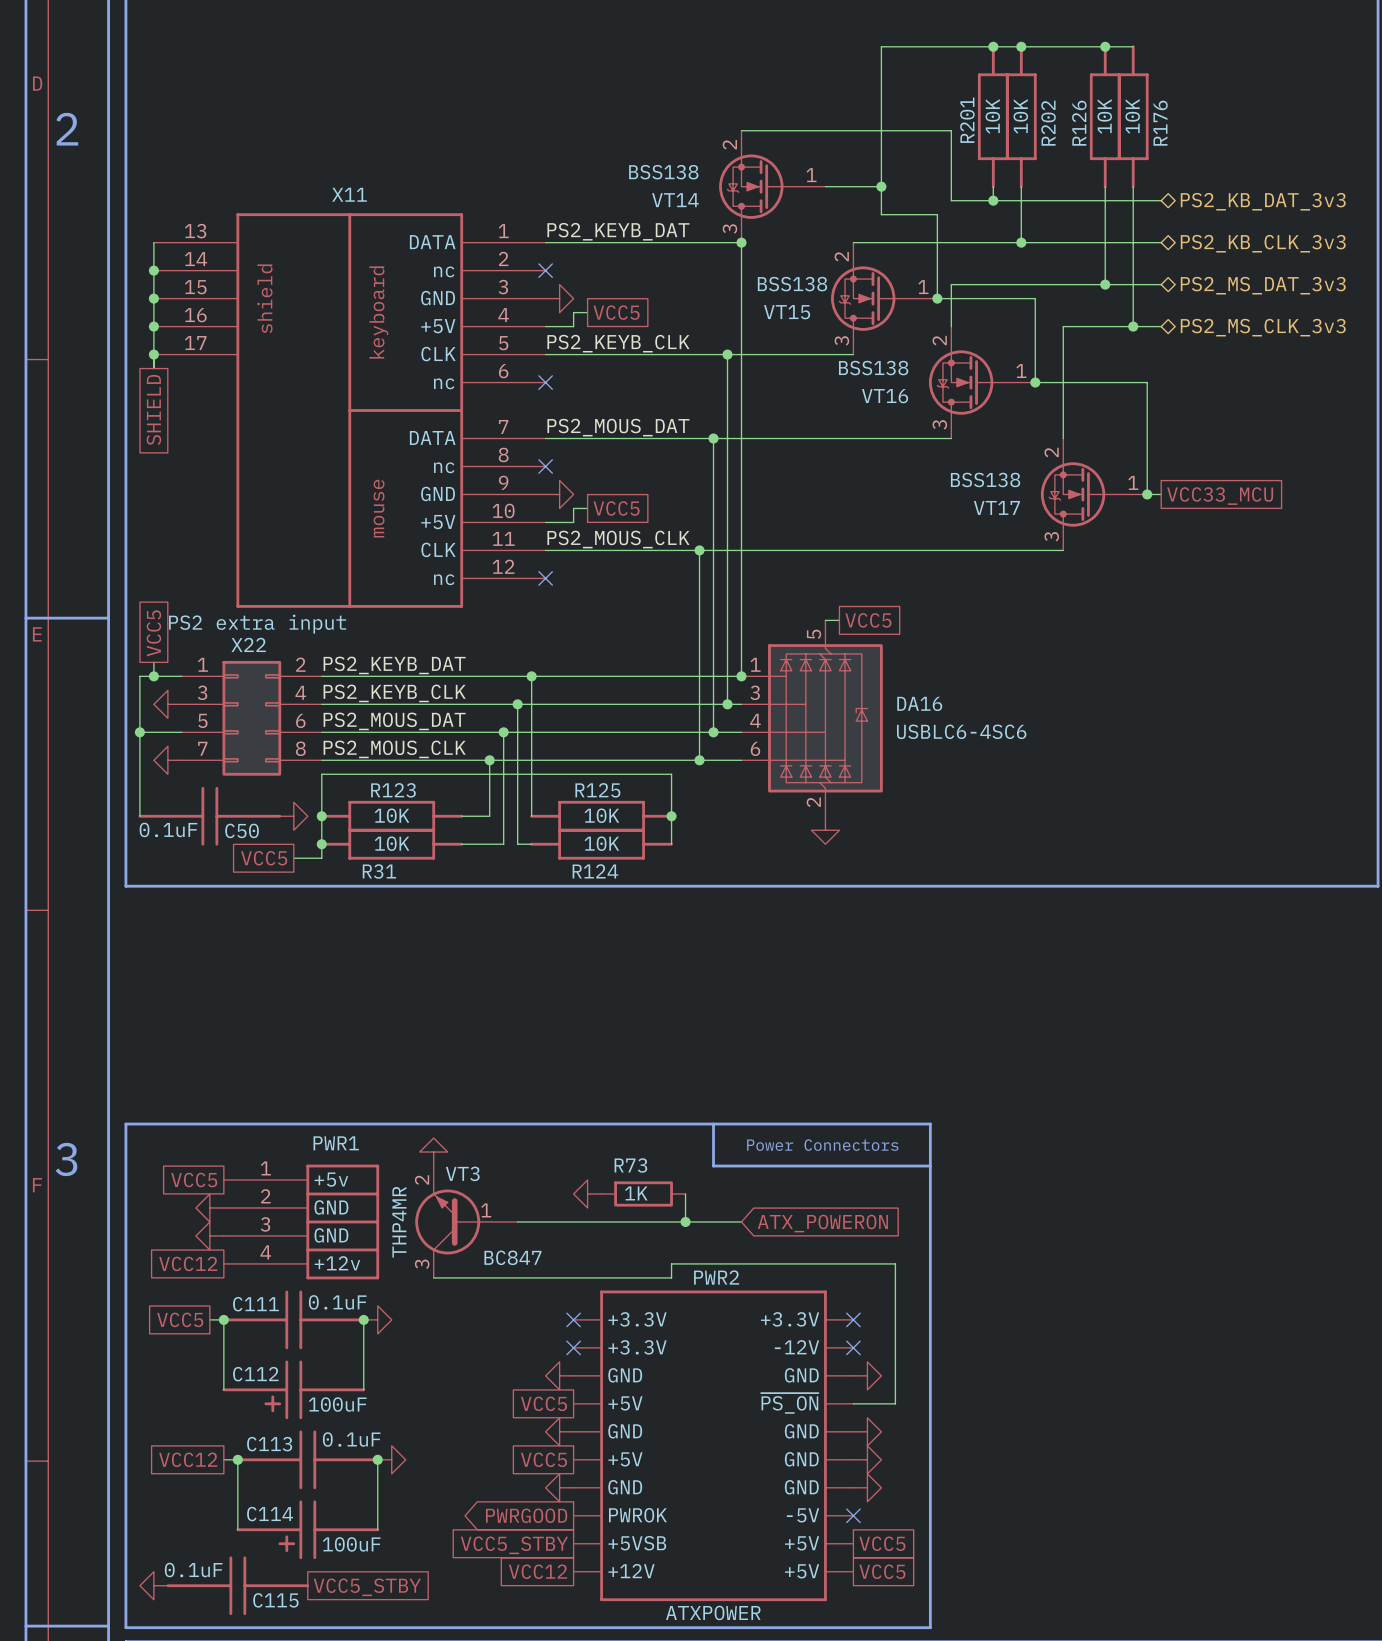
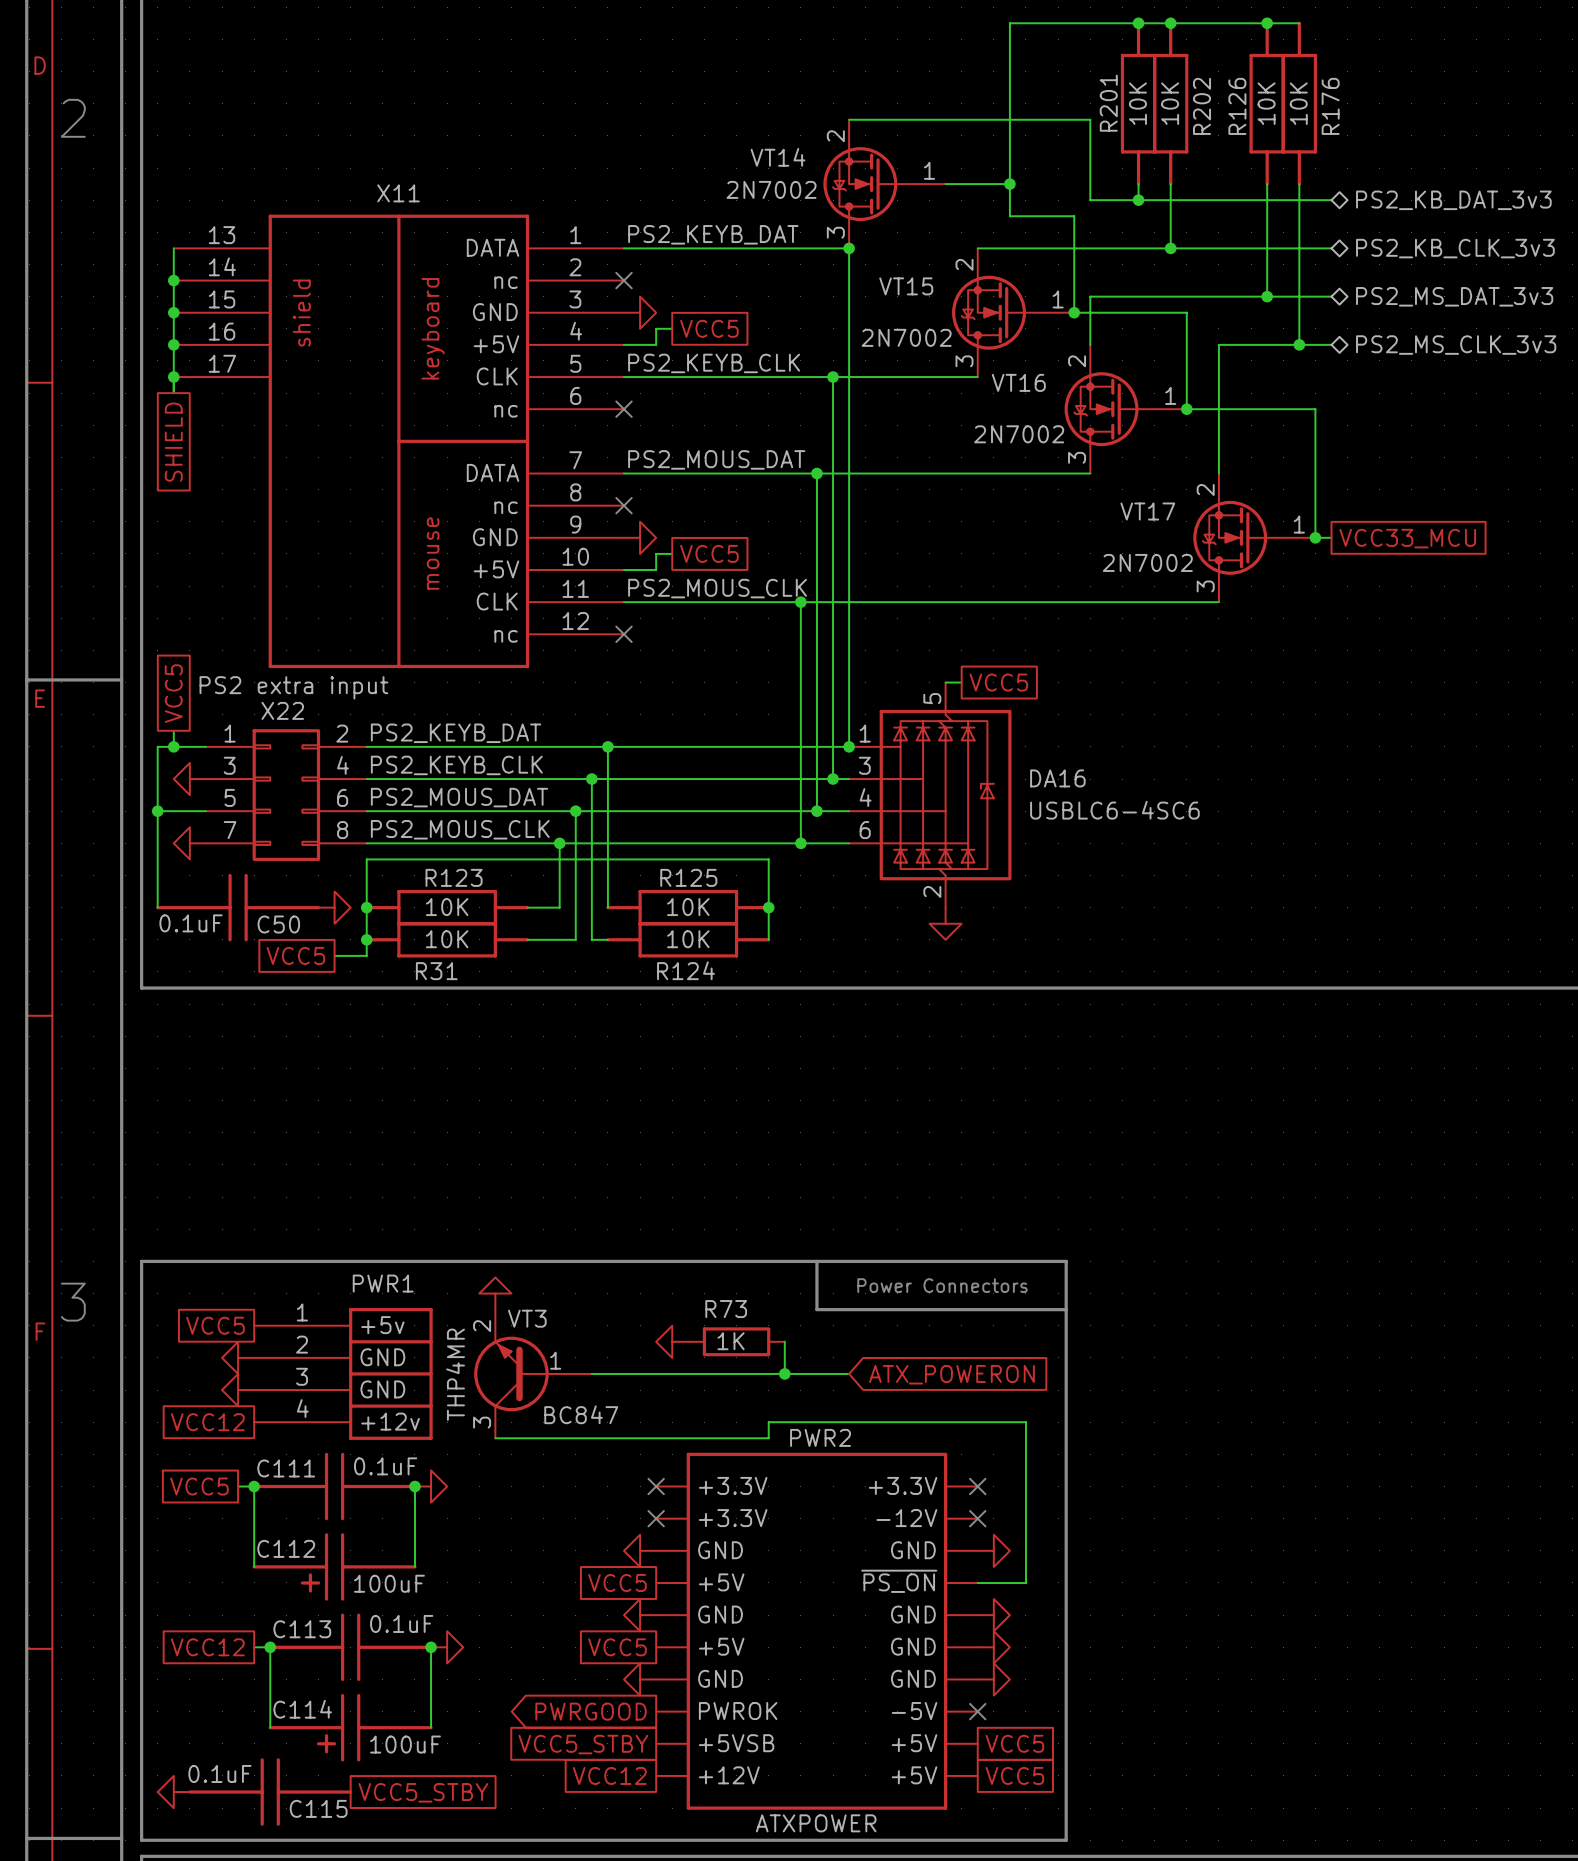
VT14 value: BSS138 (663, 172) -> 2N7002 (771, 189)
VT14 name position: VT14 (675, 200) -> VT14 (777, 157)
VT15 value: BSS138 (792, 284) -> 2N7002 (906, 337)
VT15 name position: VT15 (787, 312) -> VT15 (906, 286)
VT16 value: BSS138 (873, 368) -> 2N7002 (1019, 434)
VT16 name position: VT16 (885, 396) -> VT16 (1018, 382)
VT17 value: BSS138 (985, 479) -> 2N7002 (1147, 562)
VT17 name position: VT17 (996, 507) -> VT17 (1147, 511)

